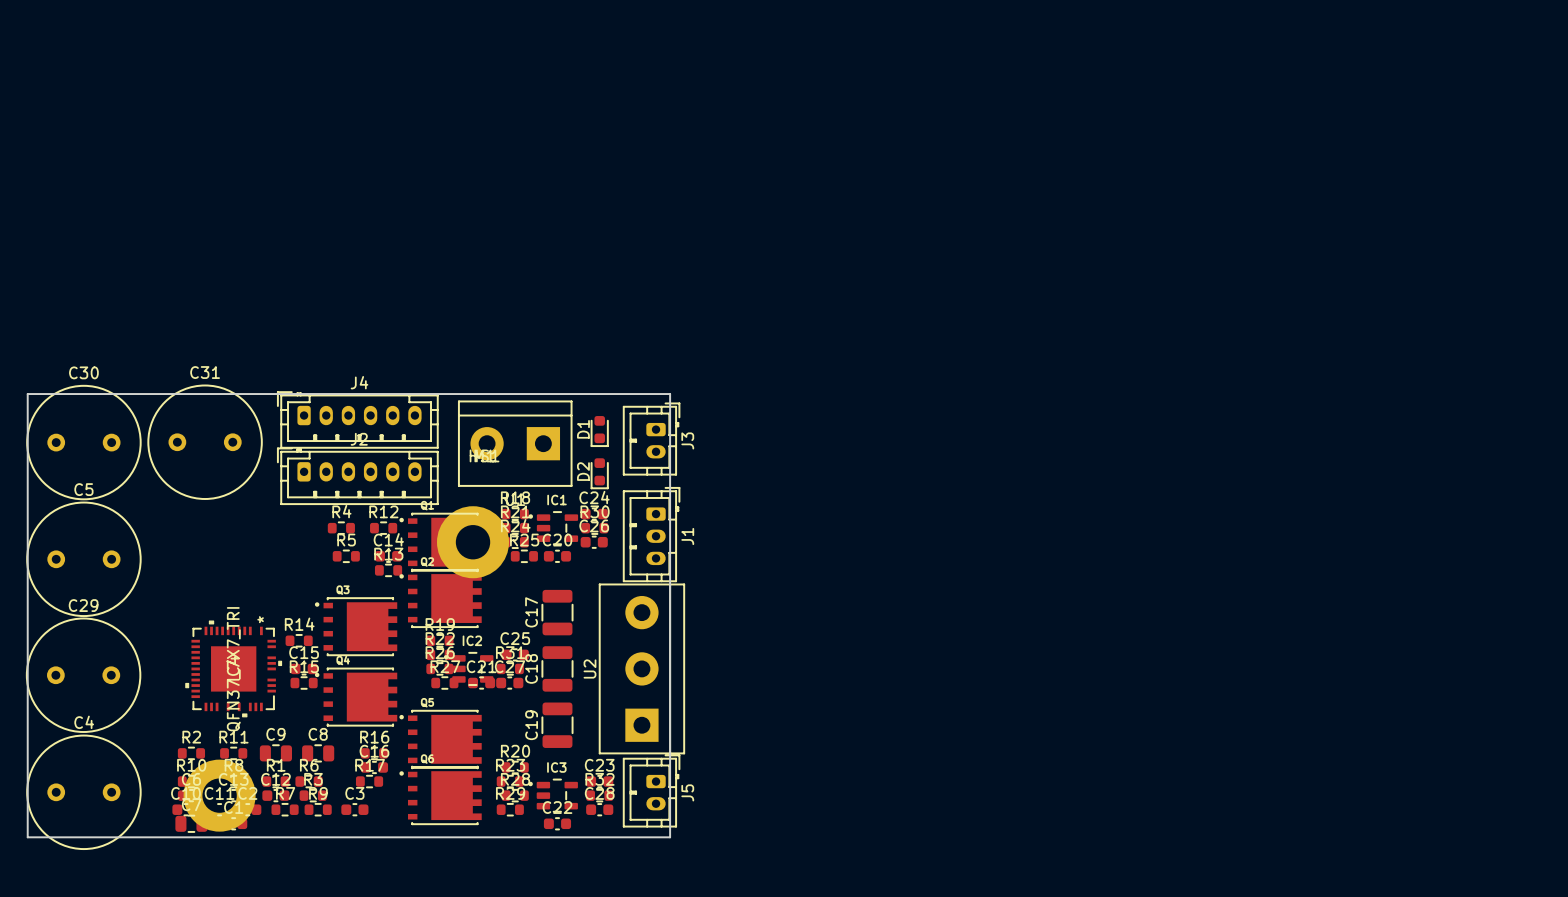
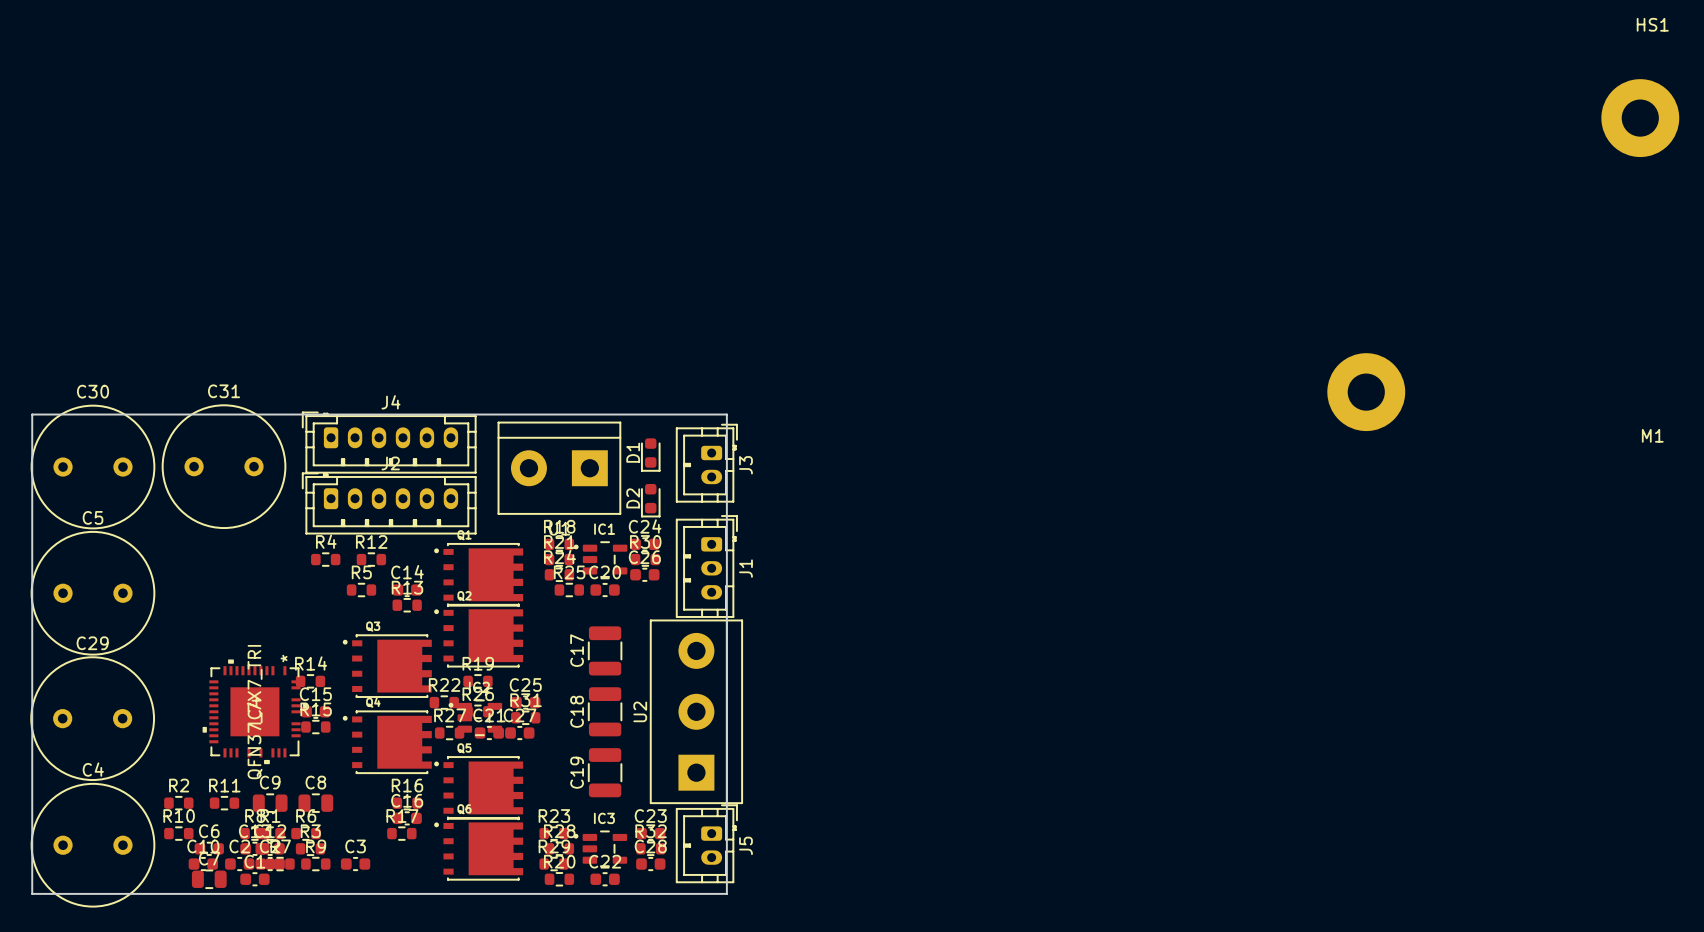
M1 position: (484, 455) -> (1652, 435)
R4 name: R4 (341, 511) -> R12 (371, 541)
R4: none -> (325, 559)
R12: (383, 528) -> none
R5 position: (346, 556) -> (361, 590)
C14 position: (388, 556) -> (407, 590)
R13 position: (388, 570) -> (407, 605)
R14 position: (299, 640) -> (310, 681)
R22 position: (439, 654) -> (444, 702)
C25 position: (515, 654) -> (525, 702)
C15 position: (304, 668) -> (315, 711)
HS1 position: (346, 668) -> (1503, 255)
IC2 position: (468, 668) -> (475, 717)
R31 position: (510, 668) -> (525, 717)
R15 position: (304, 683) -> (315, 727)
R27 position: (444, 683) -> (449, 733)
C21 position: (481, 683) -> (489, 733)
C27 position: (509, 683) -> (519, 733)
R2 position: (191, 753) -> (178, 803)
R11 position: (233, 753) -> (224, 803)
C9 position: (275, 753) -> (270, 803)
C8 position: (318, 753) -> (315, 803)
R20 position: (515, 767) -> (559, 879)
R10 position: (191, 781) -> (178, 833)
R1 position: (275, 781) -> (270, 833)
R6 position: (309, 781) -> (305, 833)
C11 name: C11 (219, 793) -> C2 (239, 846)
C12 position: (275, 795) -> (270, 848)
R3 position: (313, 795) -> (310, 848)
R7 position: (285, 809) -> (280, 864)
R9 position: (318, 809) -> (315, 864)
C3 position: (354, 809) -> (355, 864)

